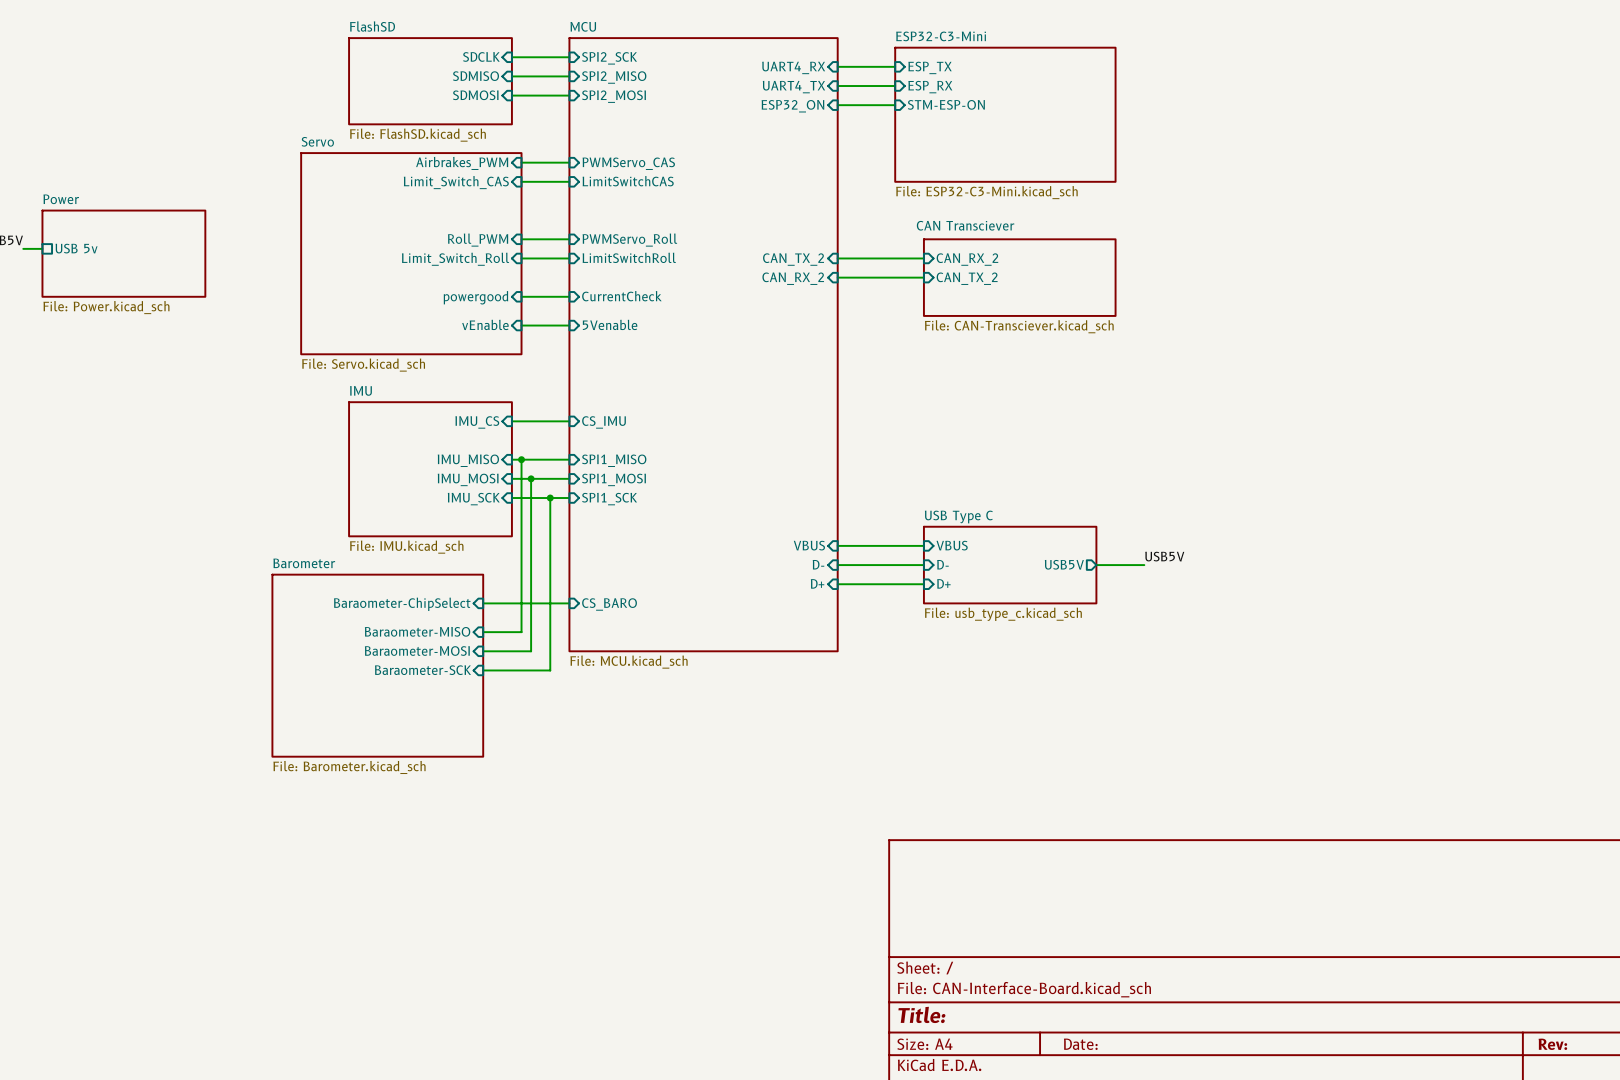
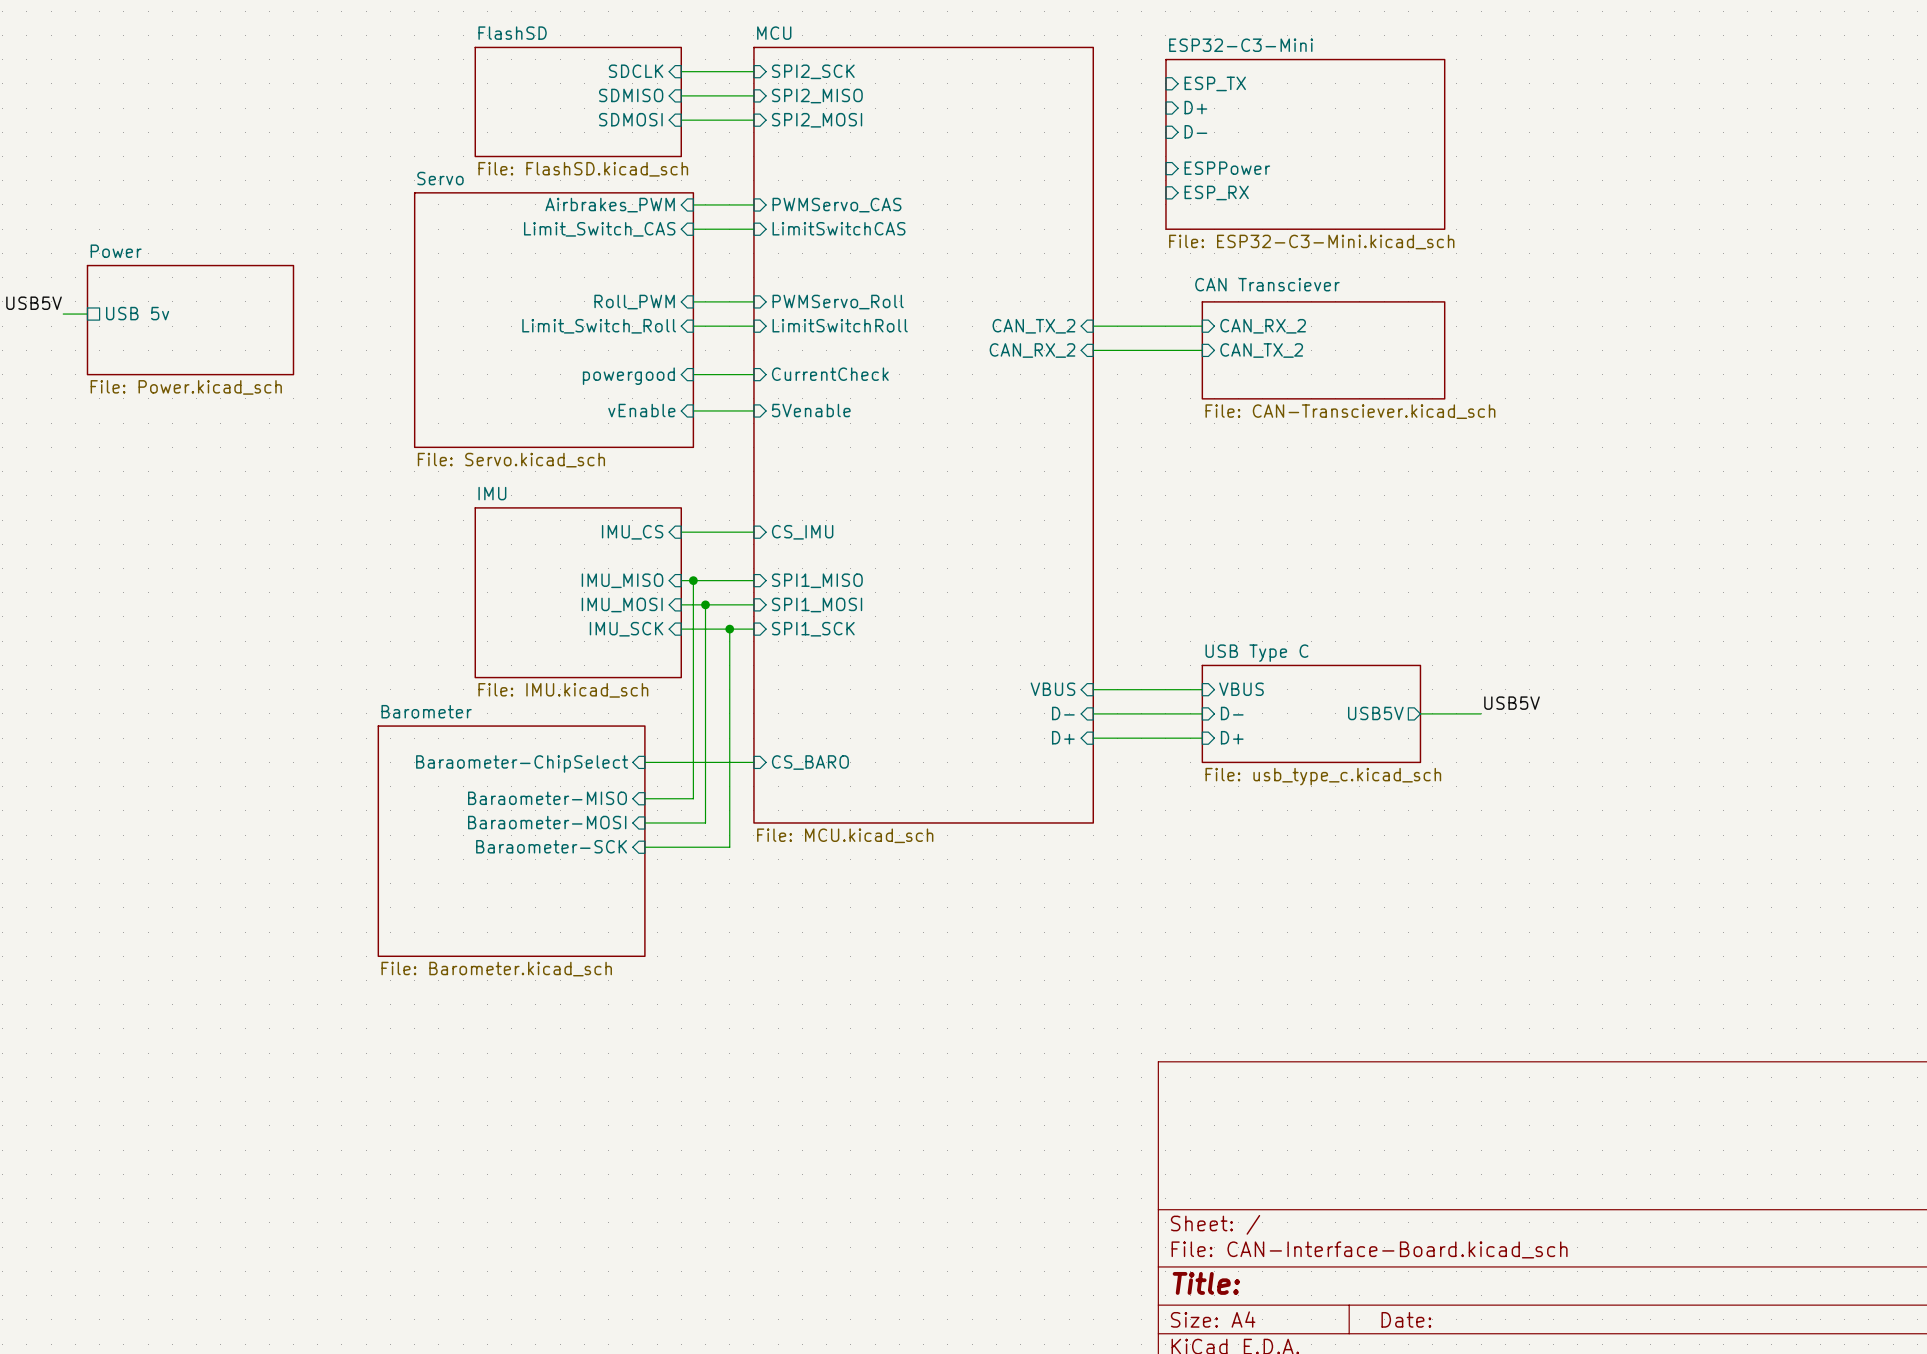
wire: (837, 66) (895, 66) -> none
sheet pin: UART4_RX (793, 67) -> none
wire: (837, 86) (895, 86) -> none
sheet pin: UART4_TX (793, 87) -> none
sheet pin: ESP_RX (930, 87) -> D+ (1195, 107)
sheet pin: STM-ESP-ON (946, 104) -> D- (1195, 131)
wire: (837, 105) (895, 105) -> none
sheet pin: ESP32_ON (792, 106) -> none
sheet pin: none -> ESPPower (1227, 168)
sheet pin: none -> ESP_RX (1216, 192)

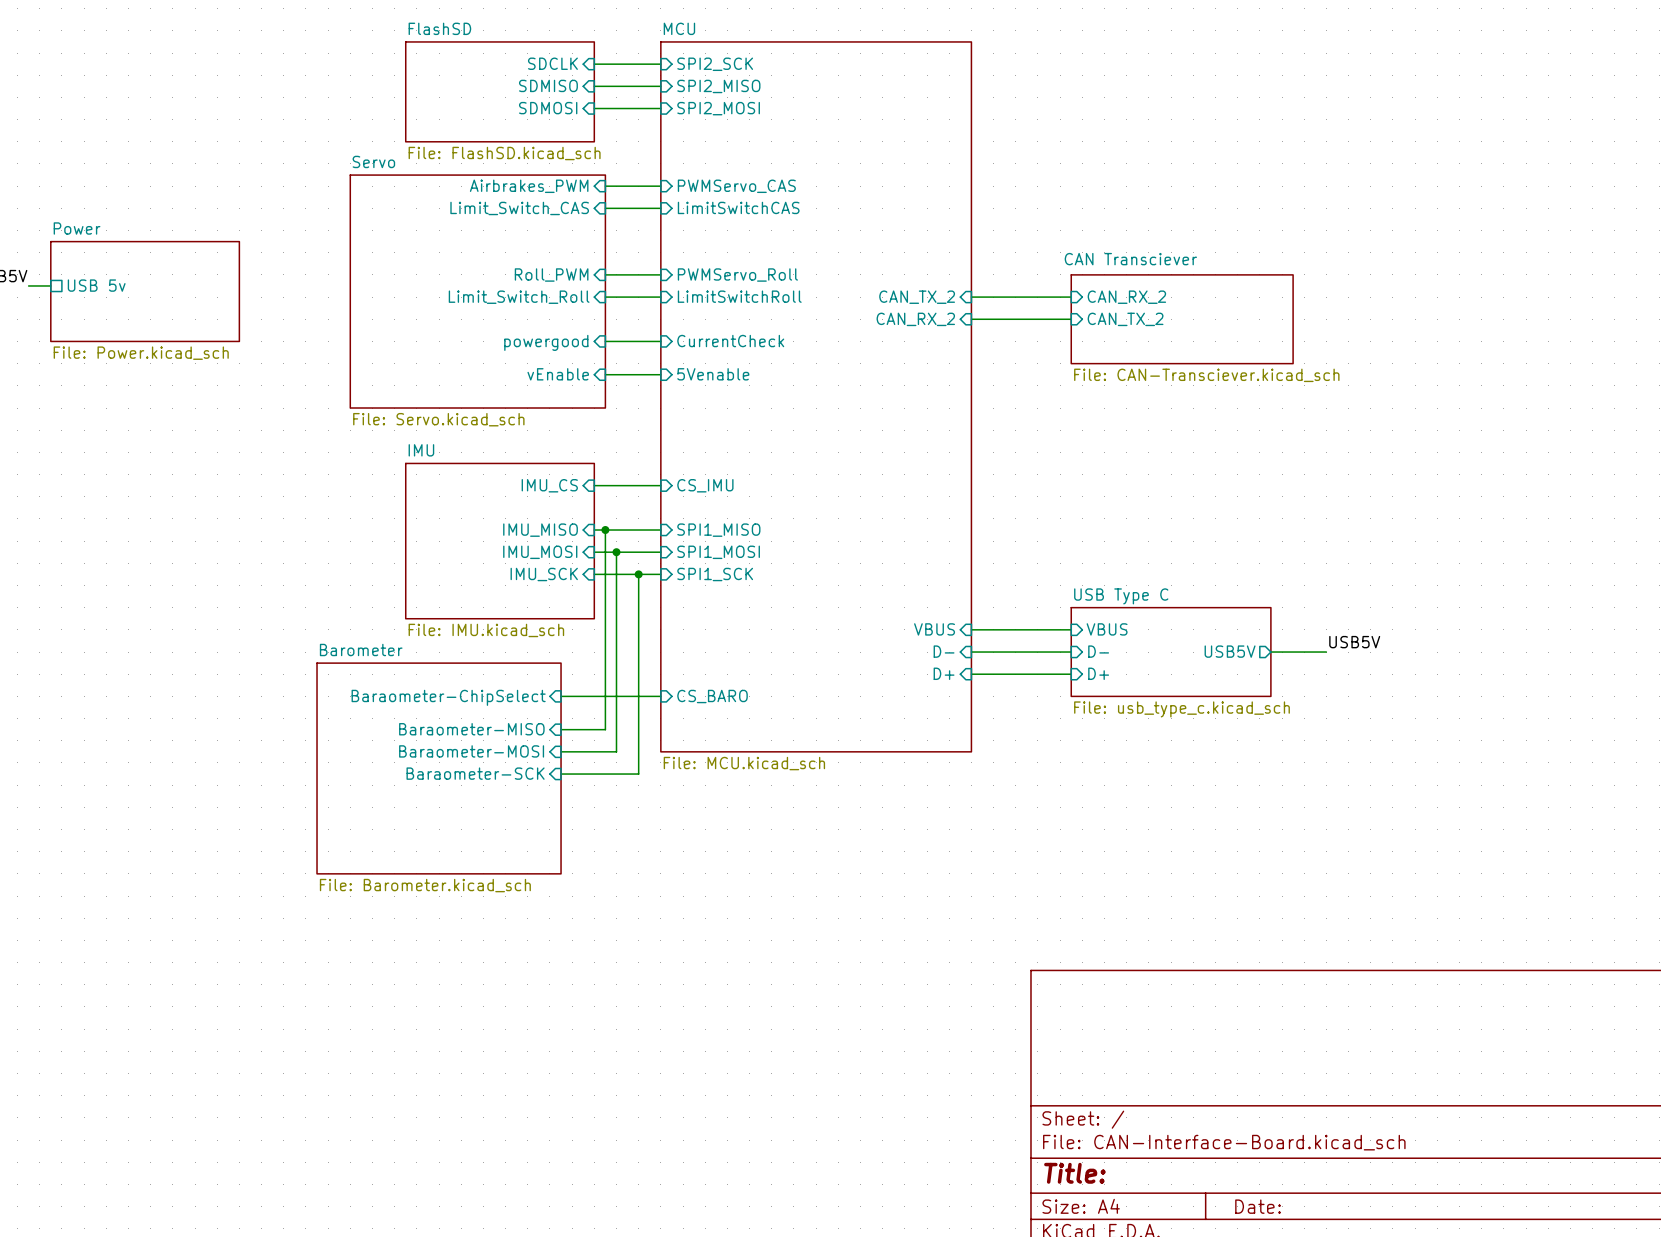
sheet pin: ESP_TX (1215, 83) -> none
sheet pin: D+ (1195, 107) -> none
sheet pin: D- (1195, 131) -> none
sheet ESP32-C3-Mini: File: ESP32-C3-Mini.kicad_sch (1305, 144) -> none
sheet pin: ESPPower (1227, 168) -> none
sheet pin: ESP_RX (1216, 192) -> none

